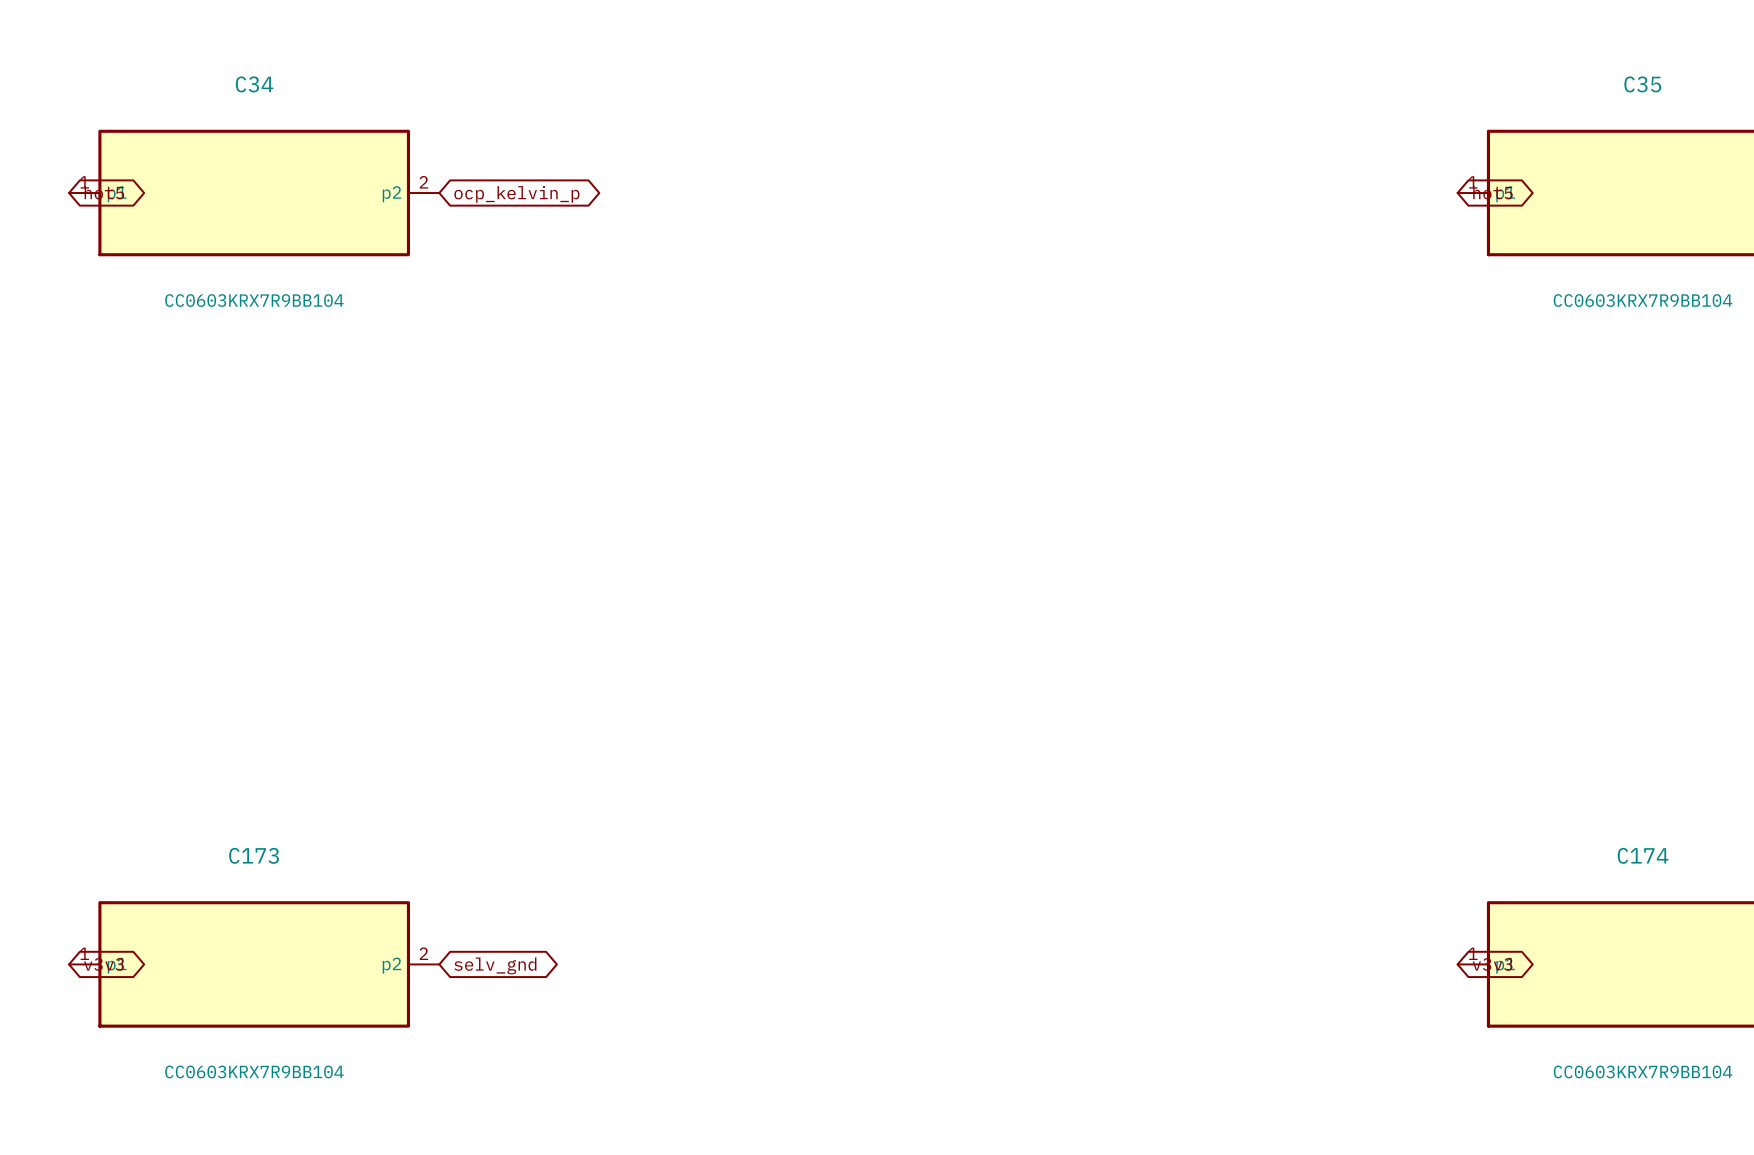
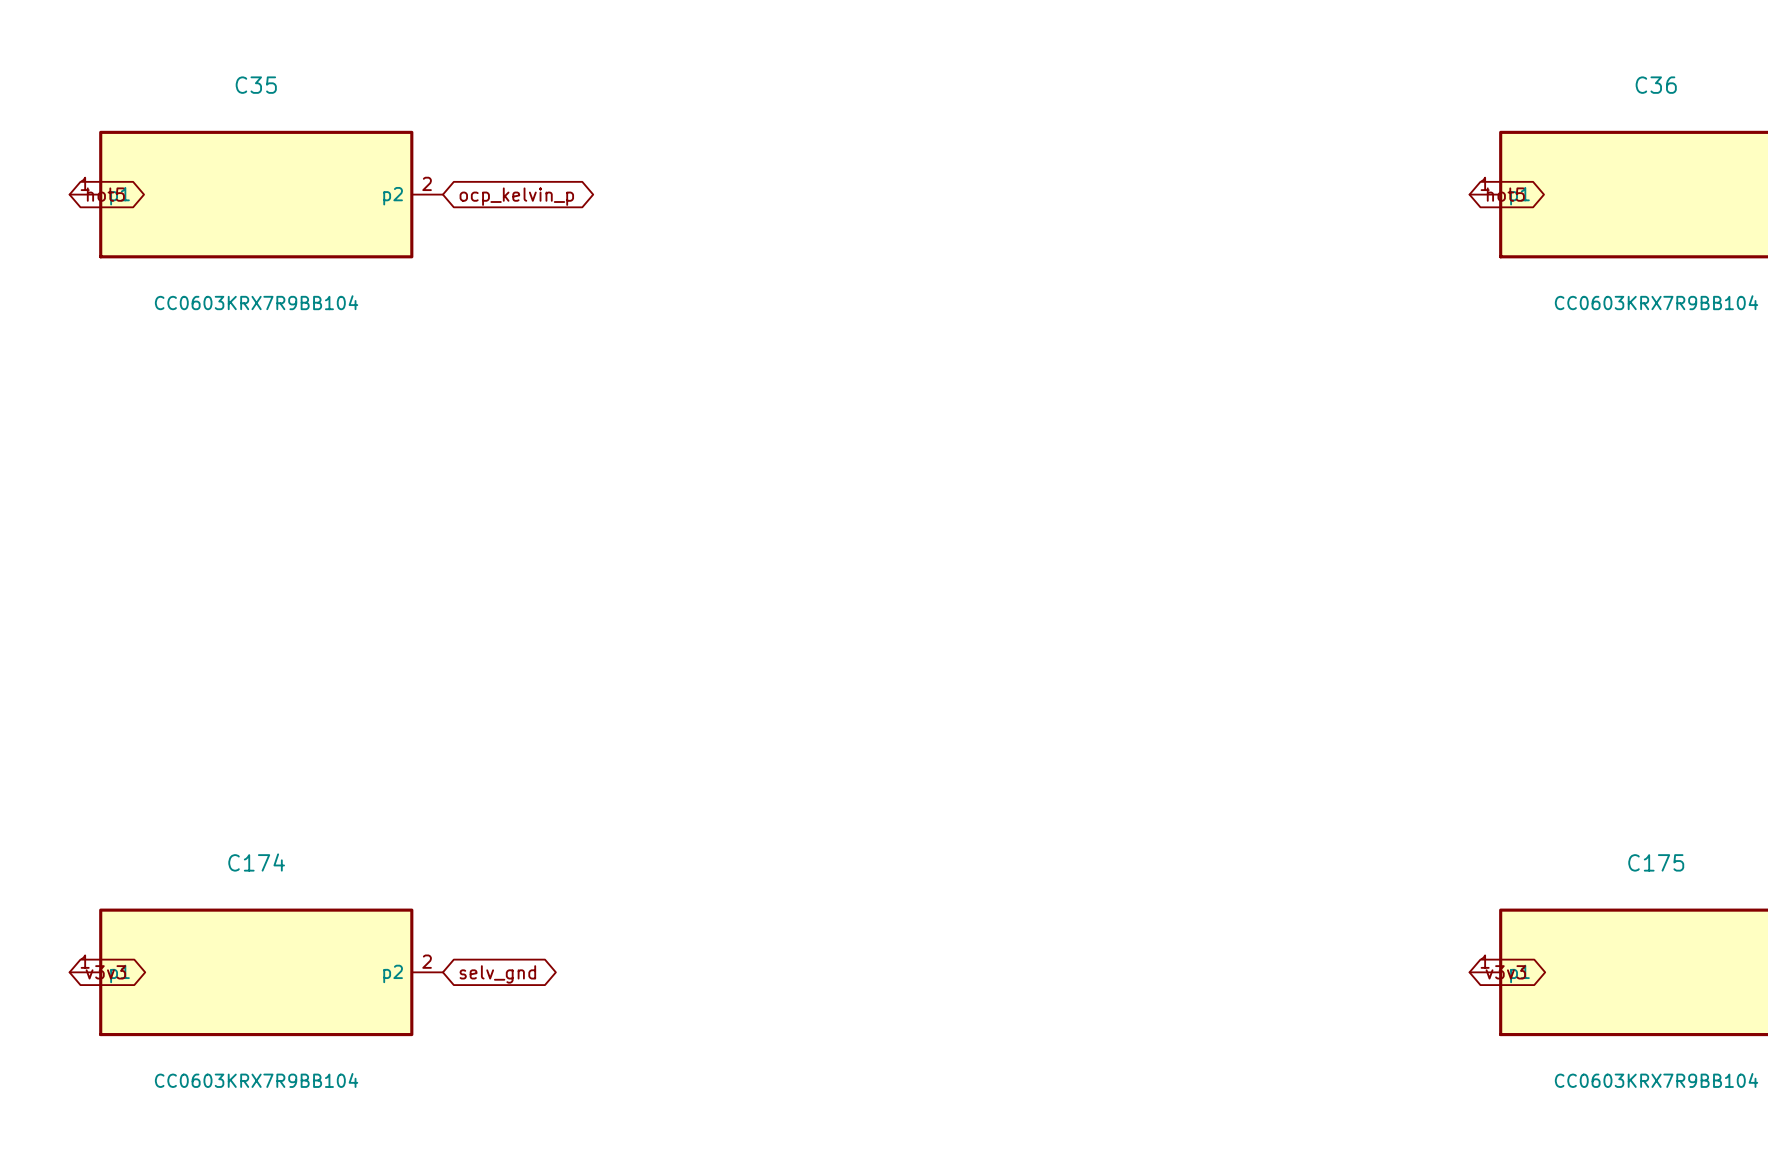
C34 name: C34 (254, 84) -> C35 (256, 85)
C35 name: C35 (1642, 84) -> C36 (1656, 85)
C173 name: C173 (254, 855) -> C174 (256, 862)
C174 name: C174 (1643, 855) -> C175 (1656, 862)

